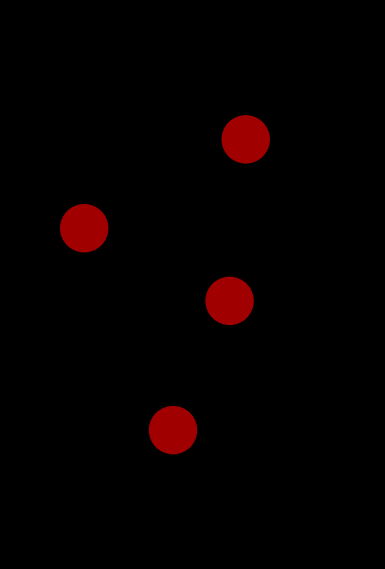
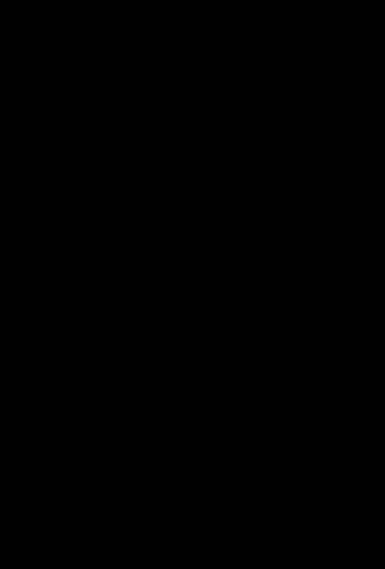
part: (245, 139) -> none
part: (84, 228) -> none
part: (229, 300) -> none
part: (173, 430) -> none

